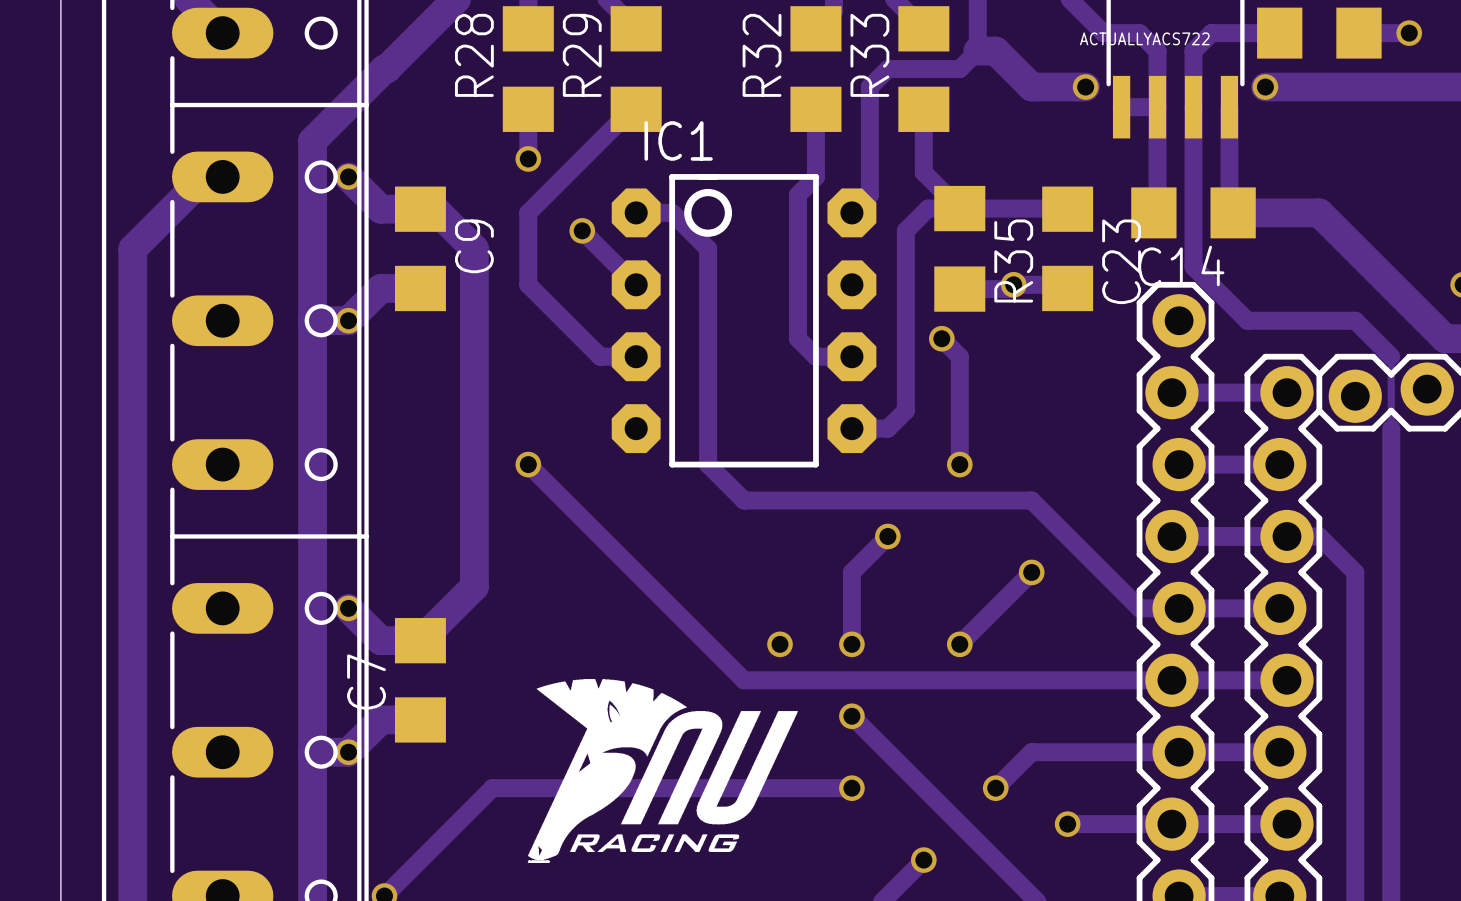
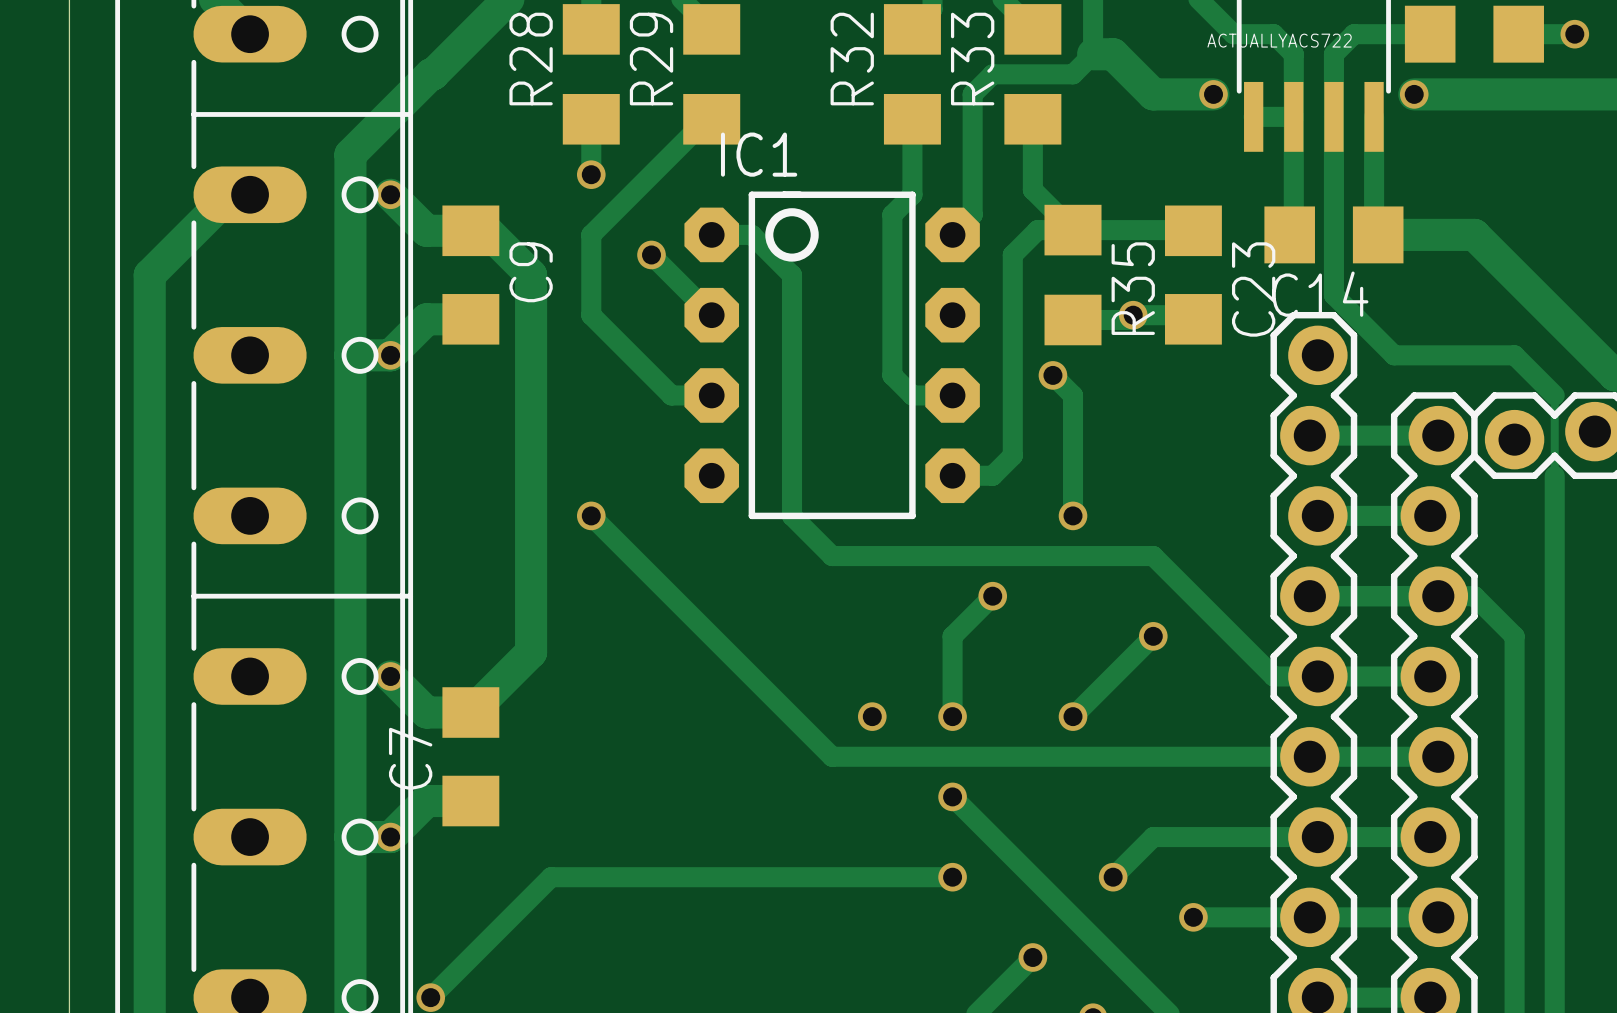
drawing: [528, 679, 798, 861] -> none

